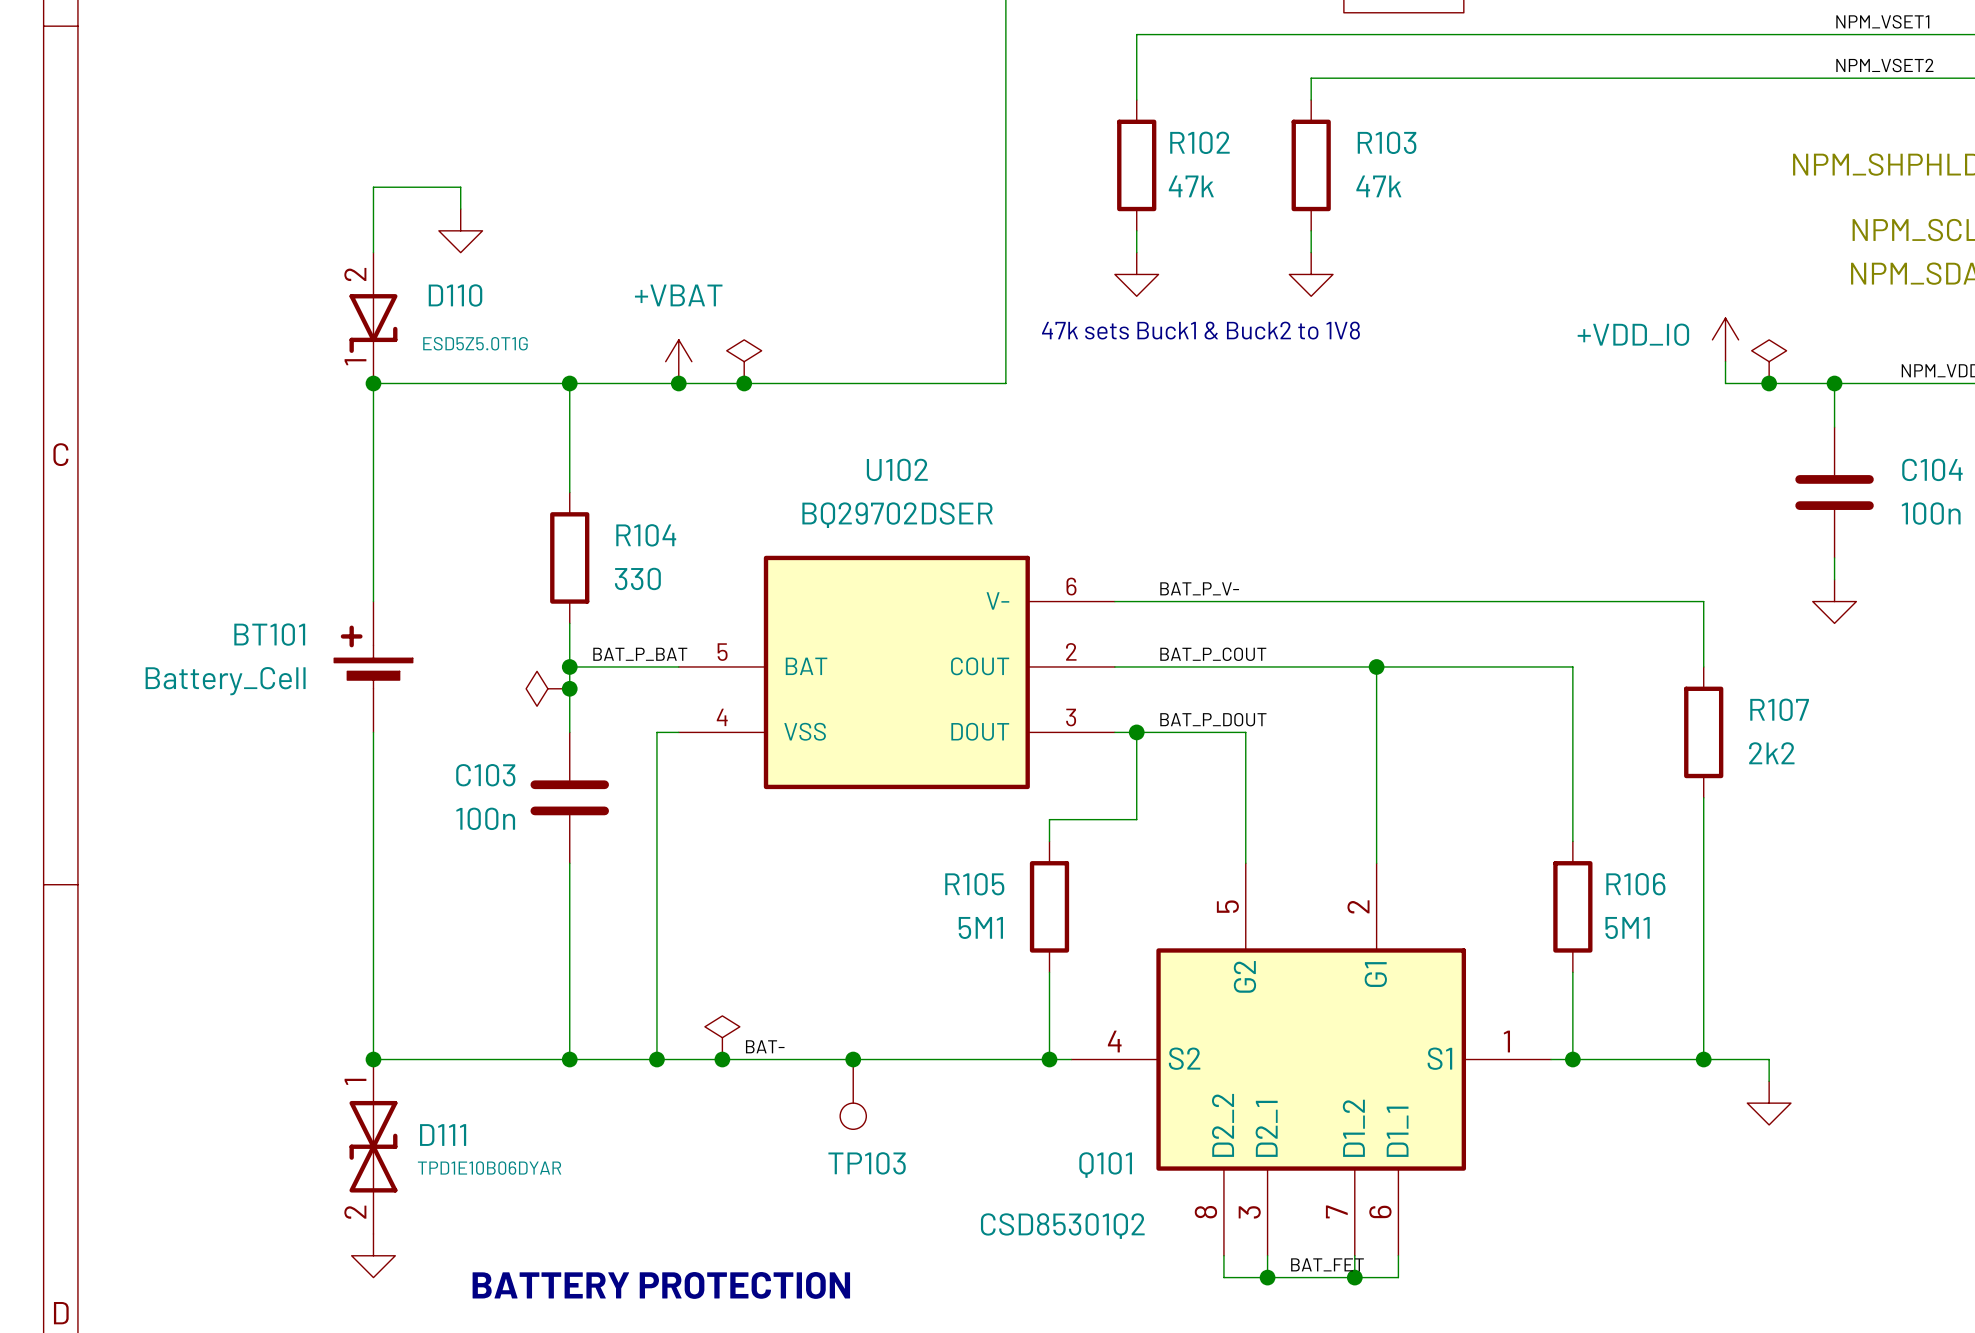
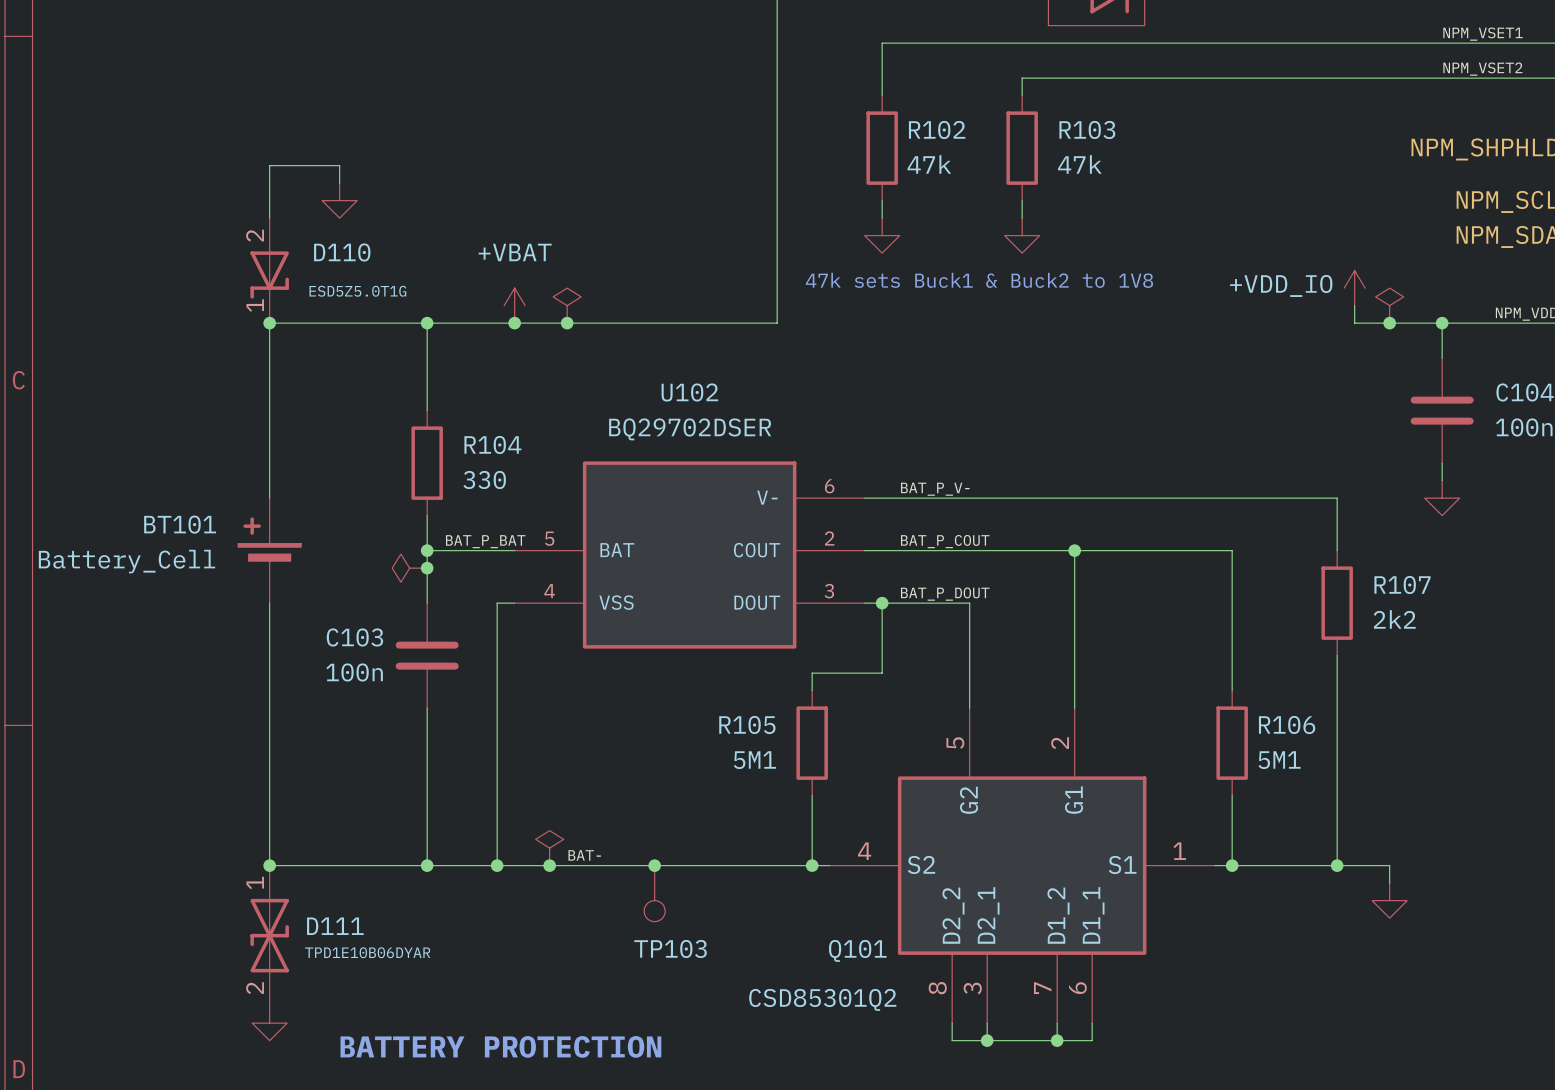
label: BAT_FET (1327, 1264) -> none

